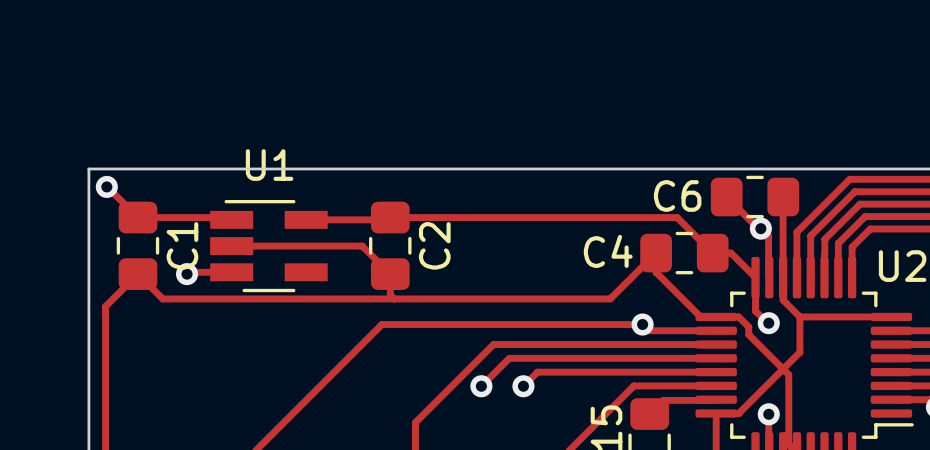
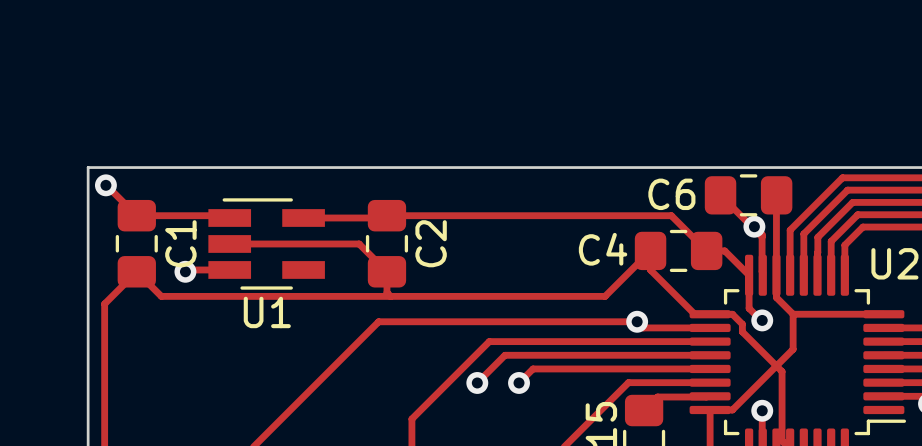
U1 name position: U1 (269, 165) -> U1 (267, 312)

